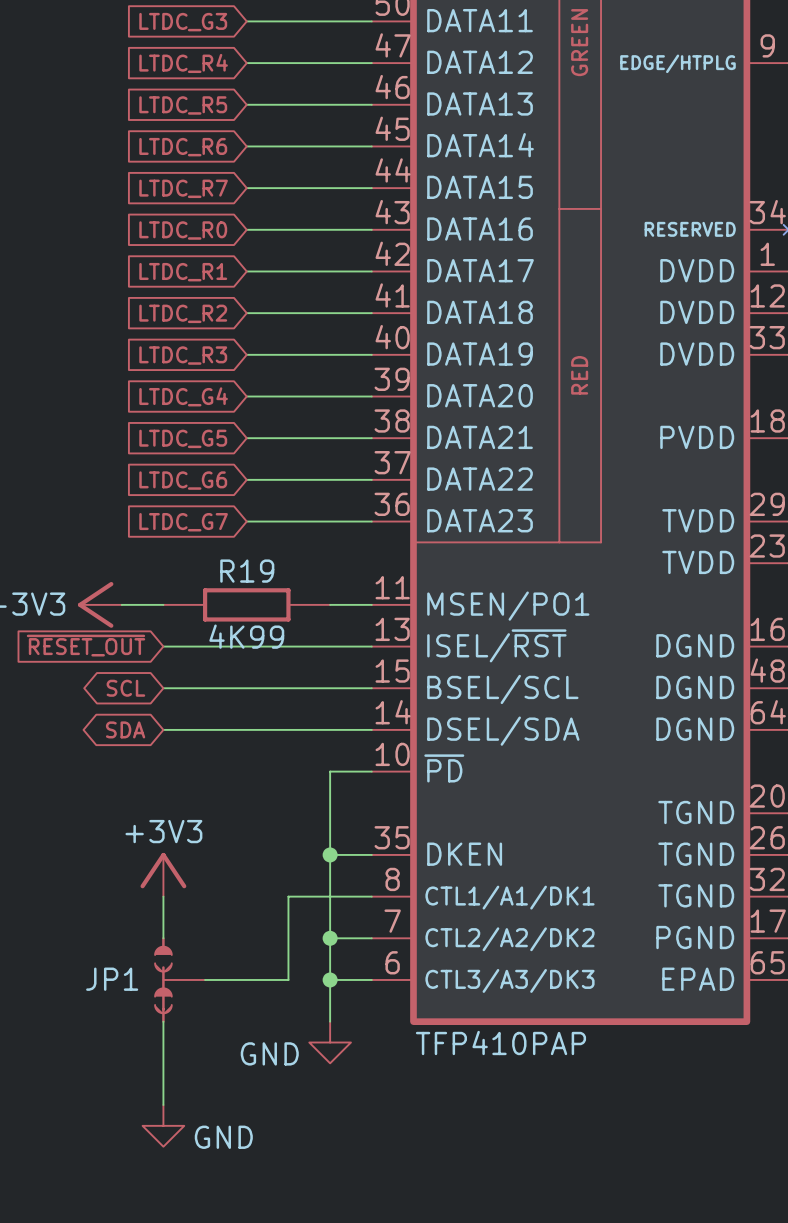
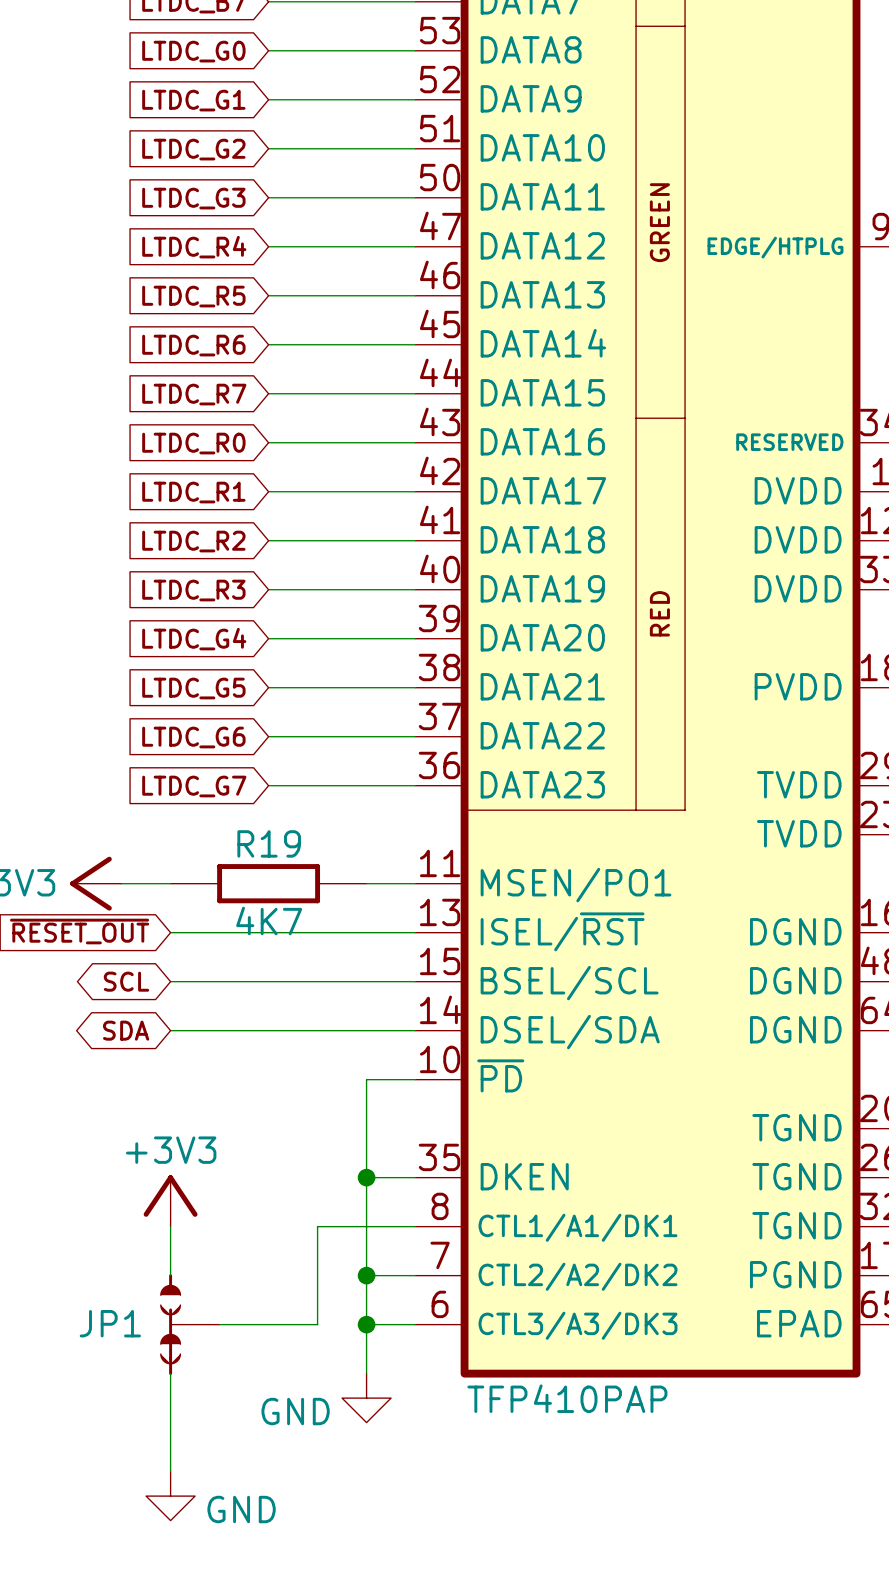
R19 value: 4K99 (246, 636) -> 4K7 (269, 921)

